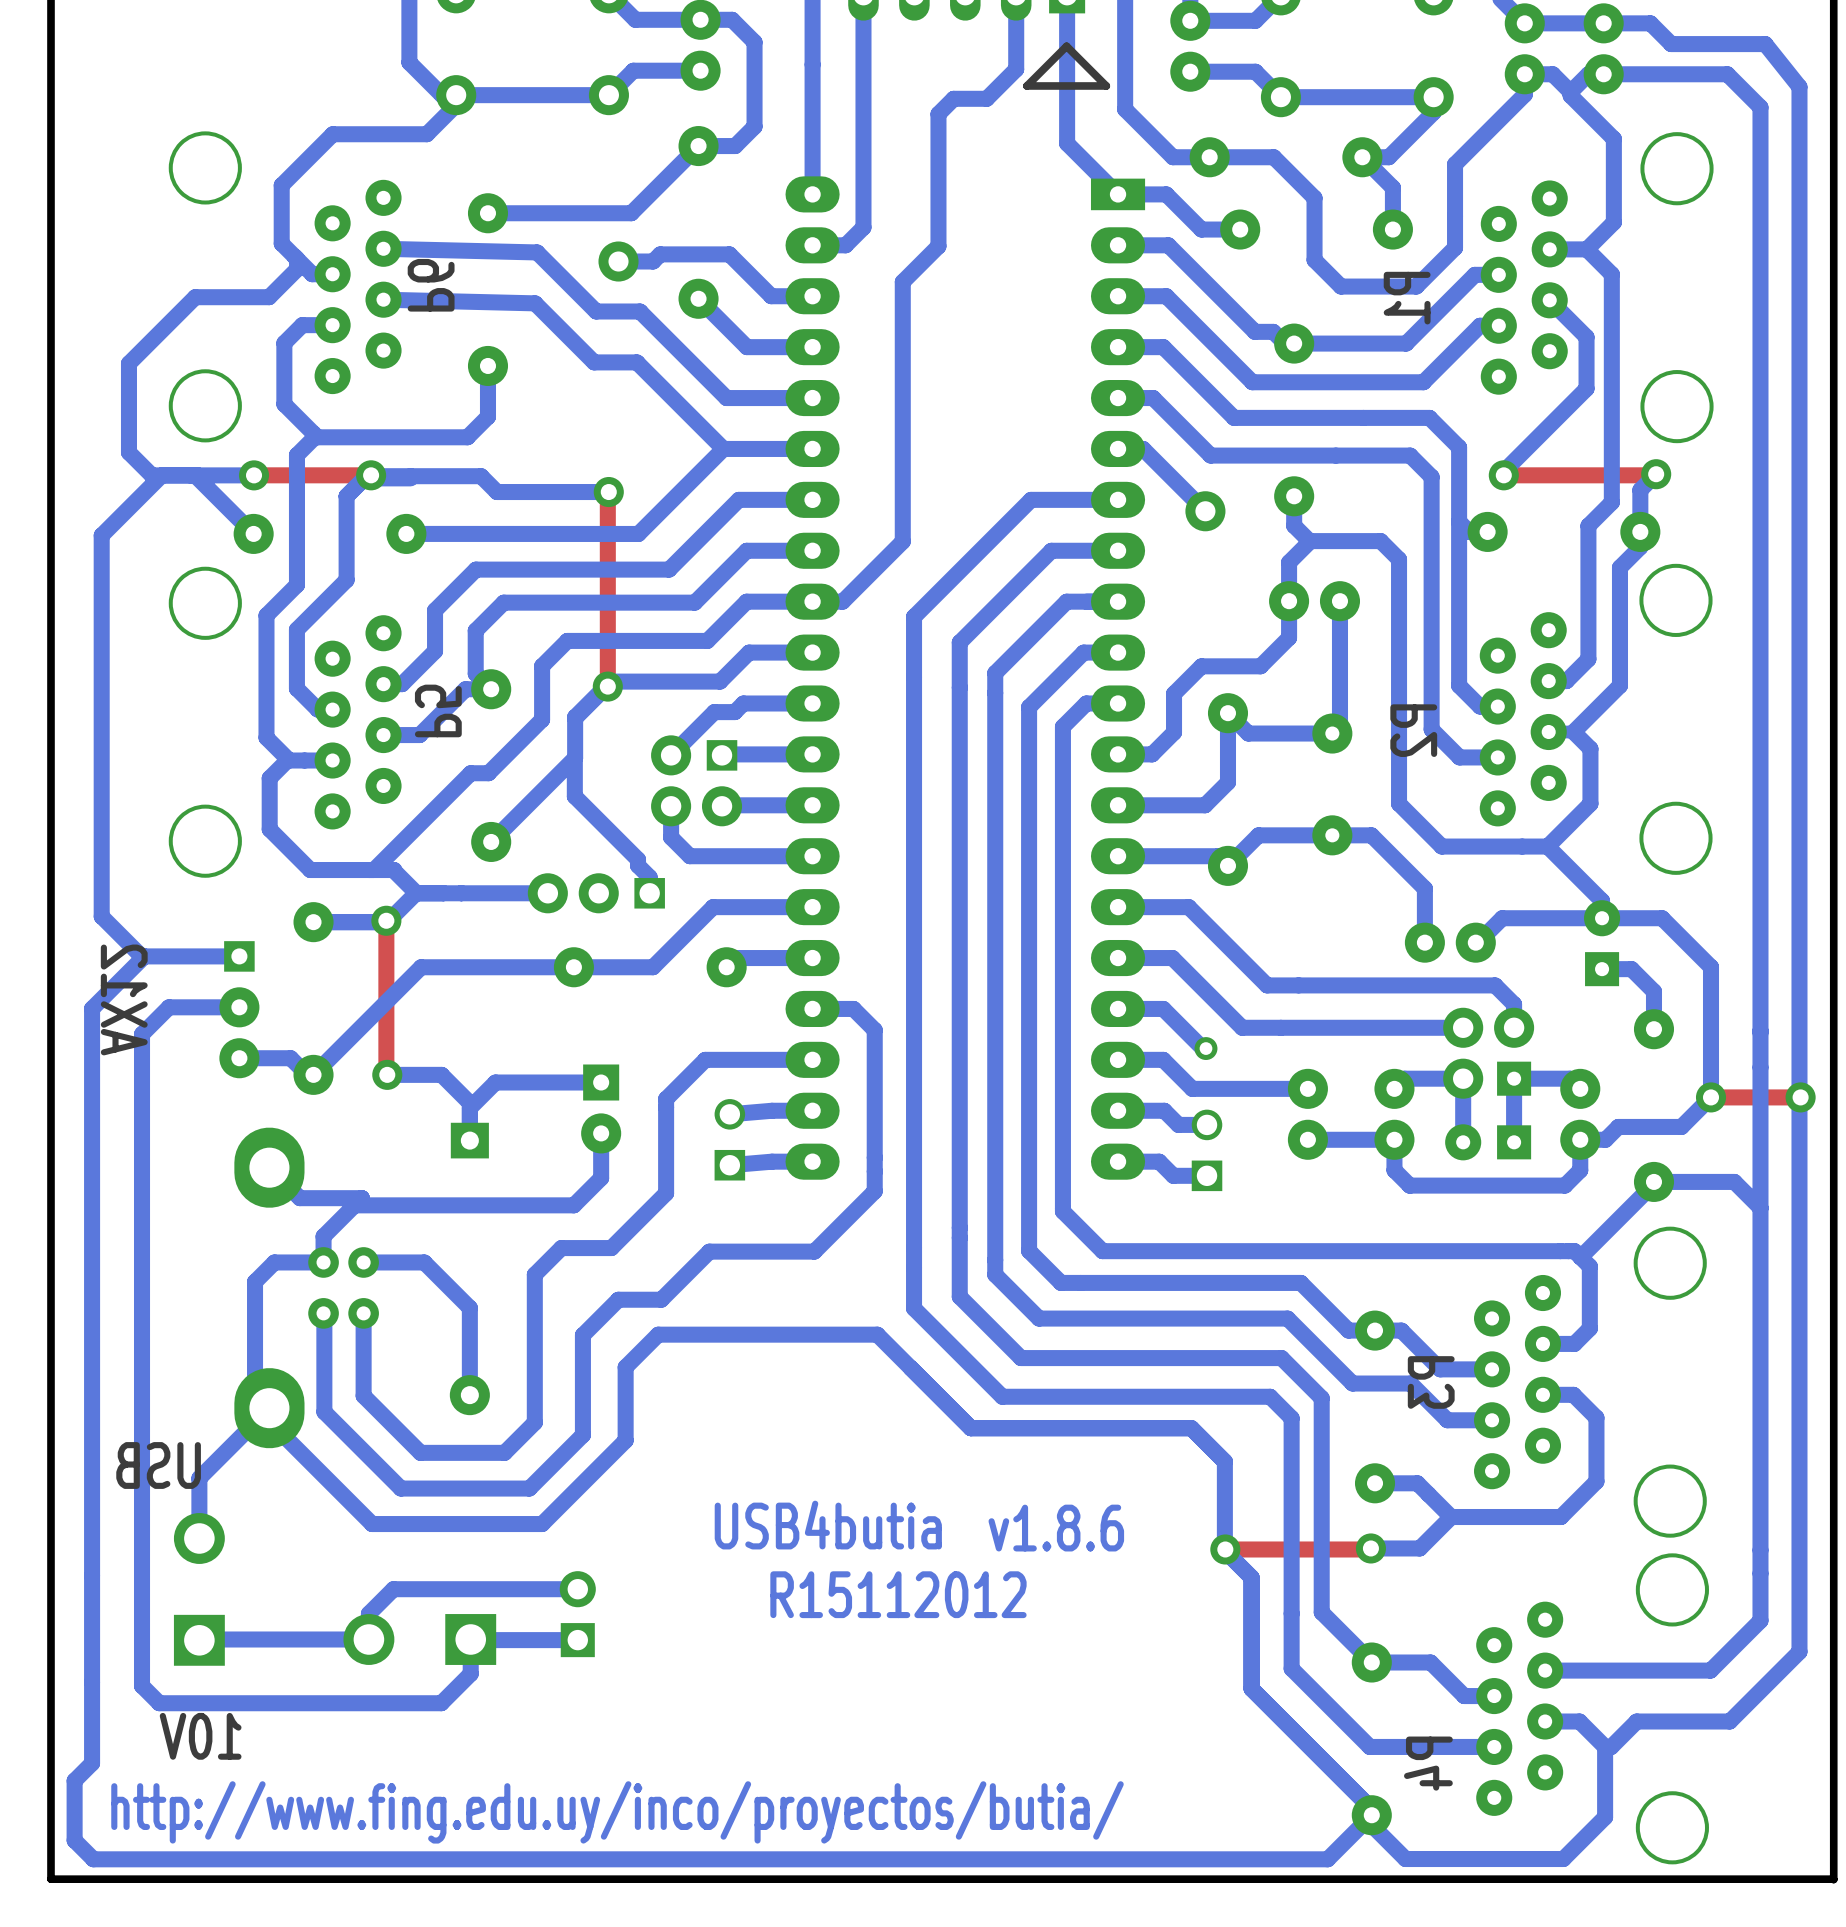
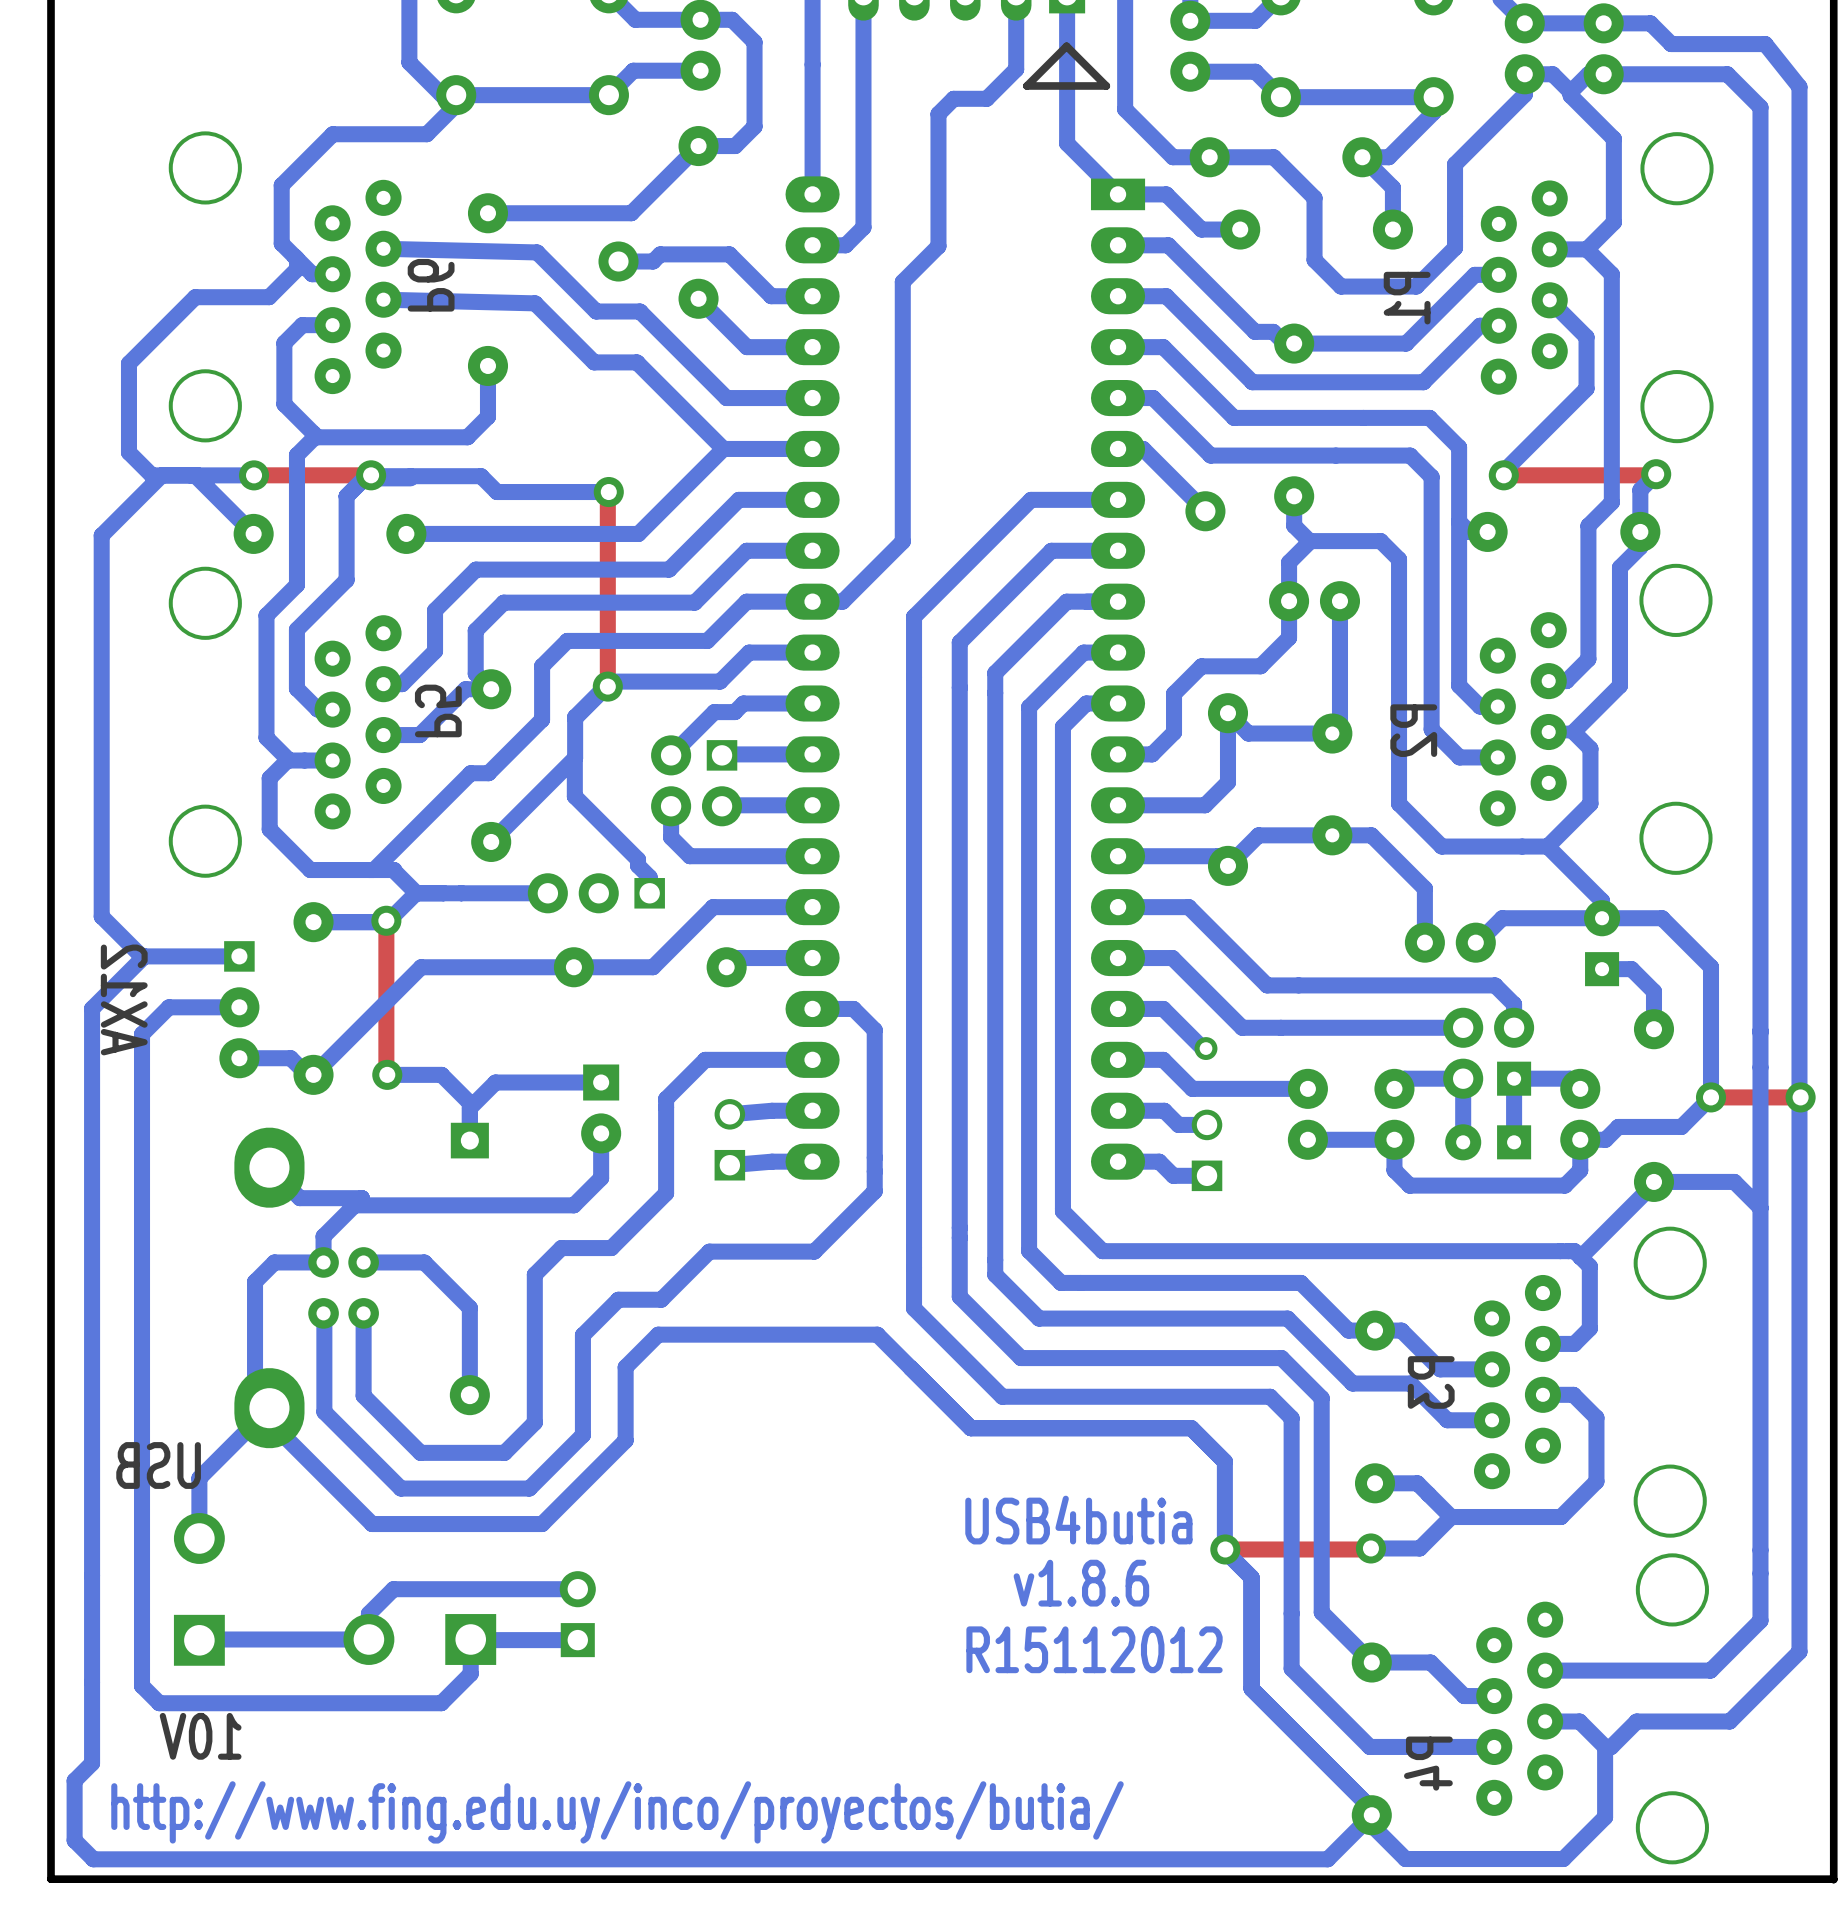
text position: USB4butia (828, 1525) -> USB4butia (1078, 1520)
text position: v1.8.6 (1056, 1528) -> v1.8.6 (1081, 1583)
text position: R15112012 (898, 1594) -> R15112012 (1094, 1649)

